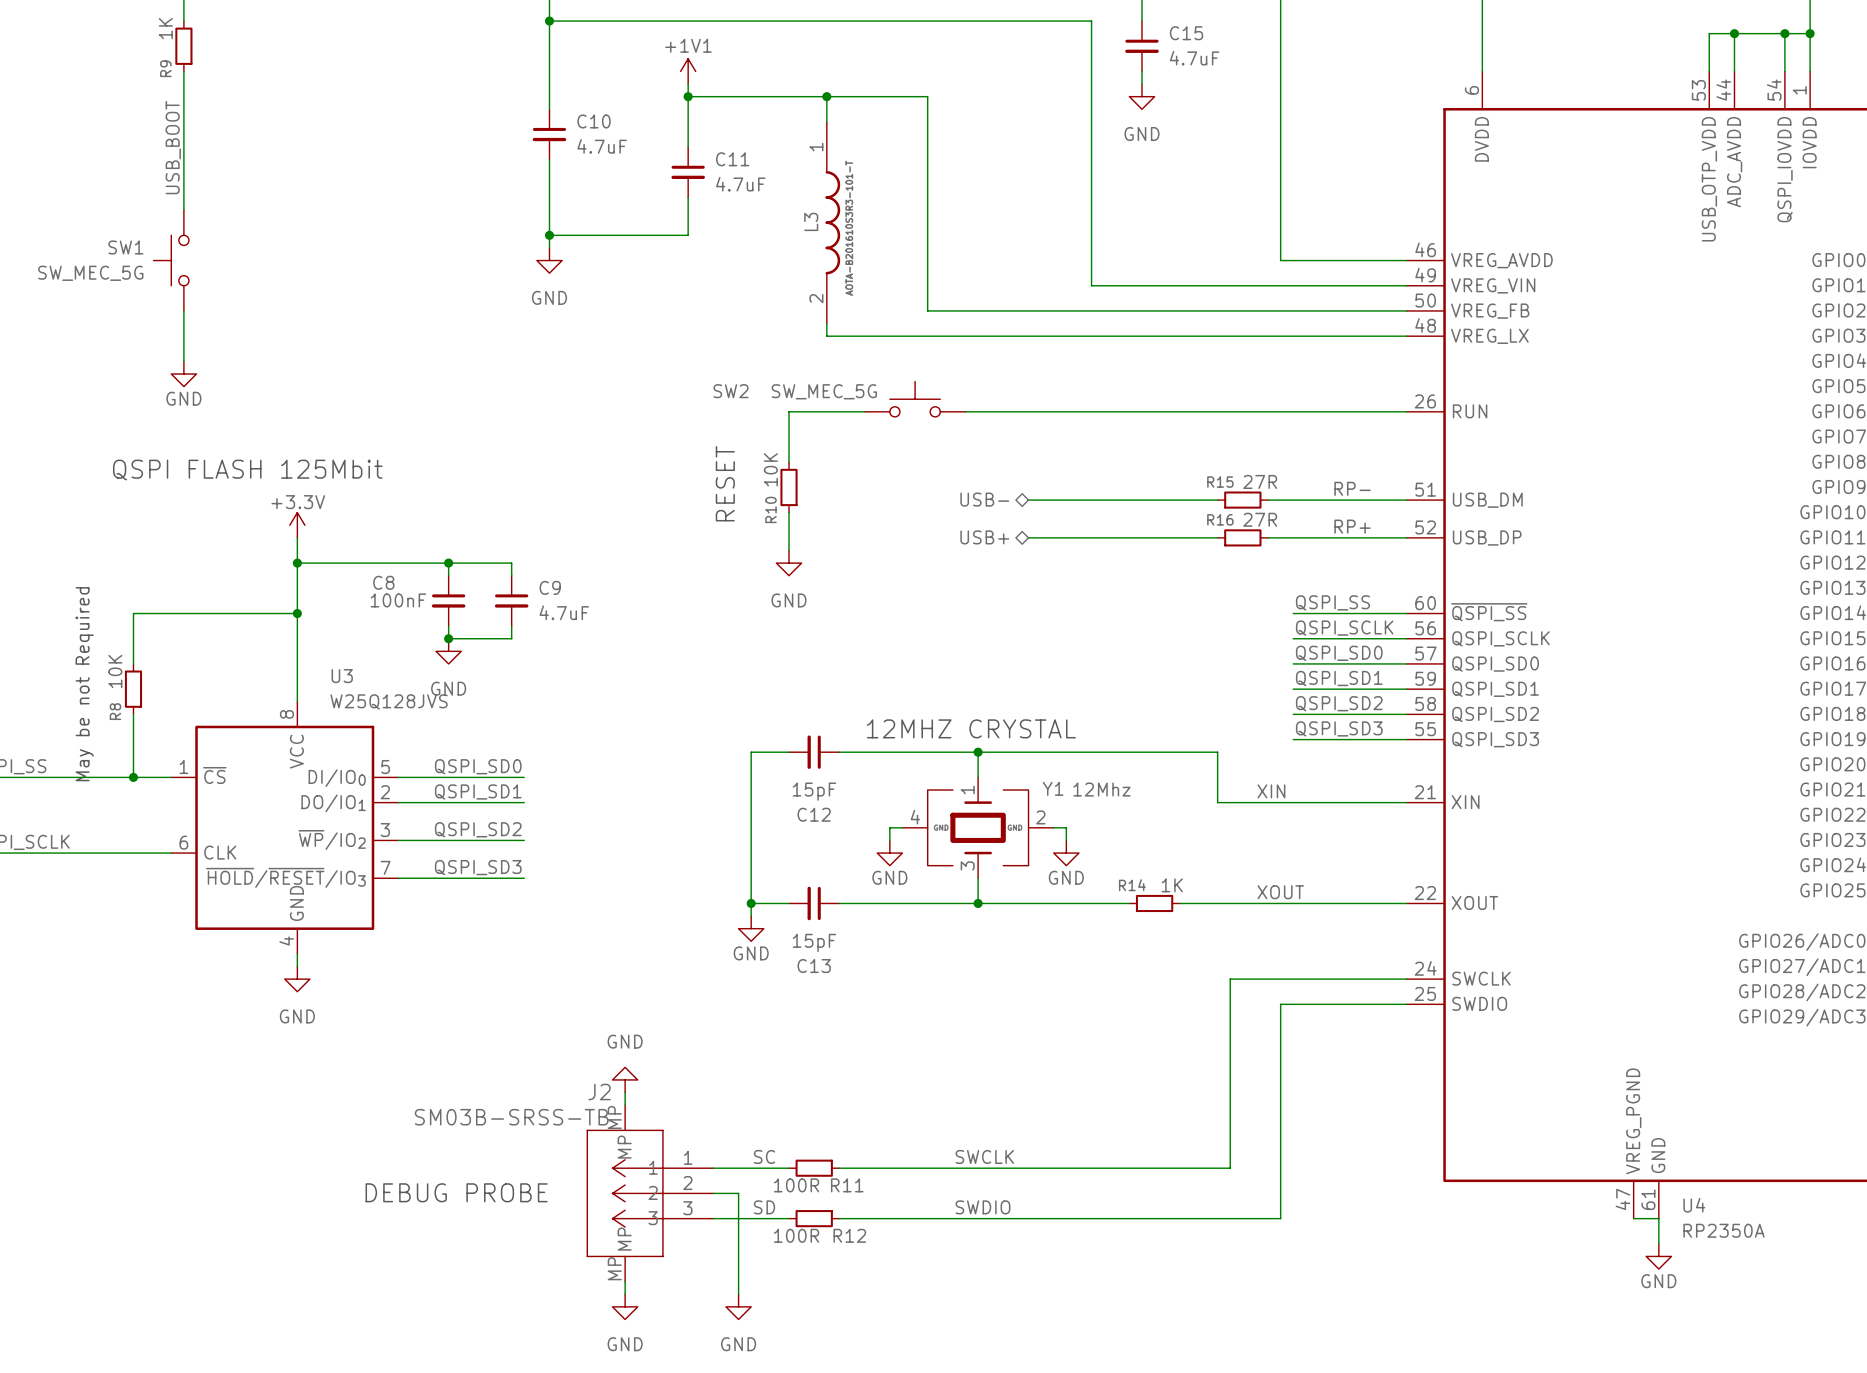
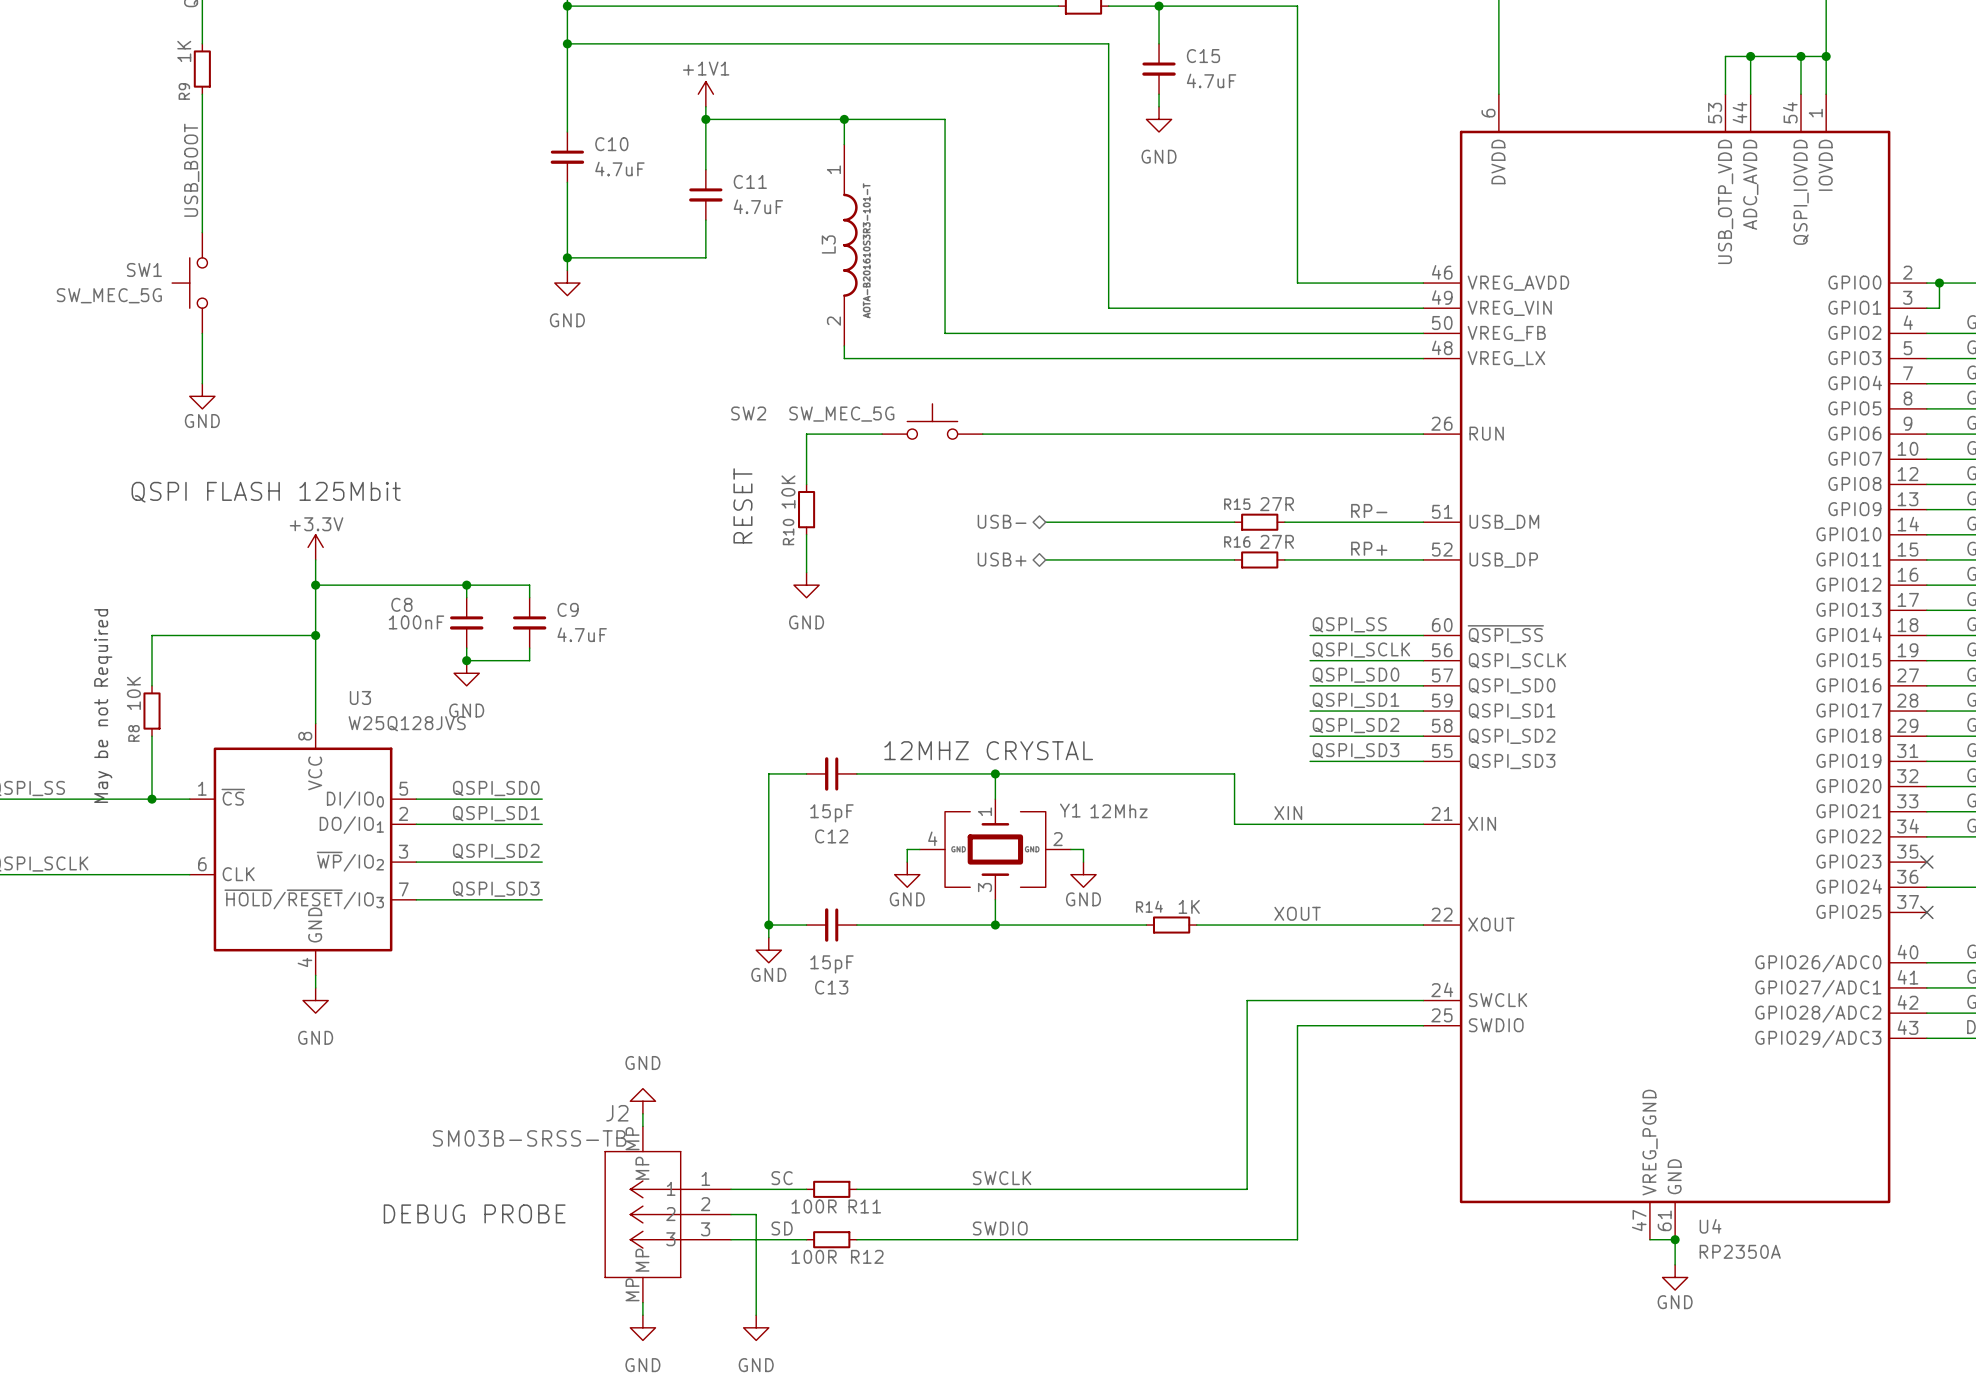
junction: none -> (1675, 1239)

